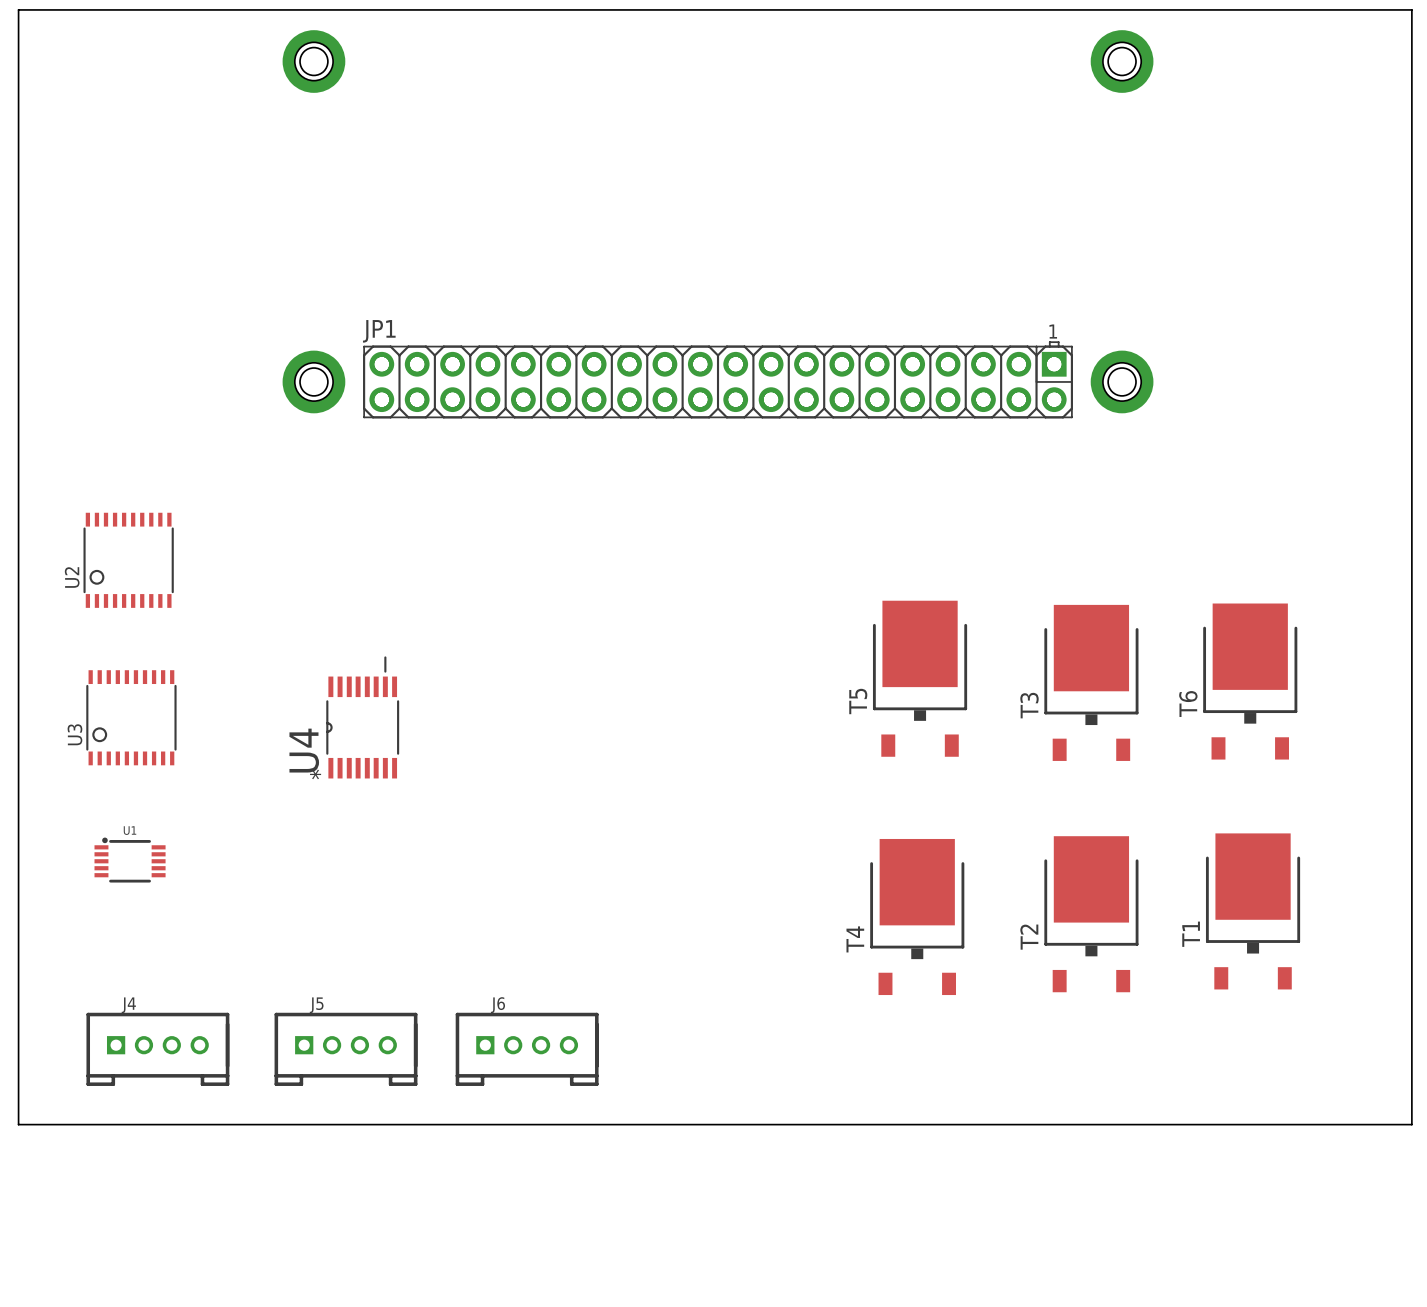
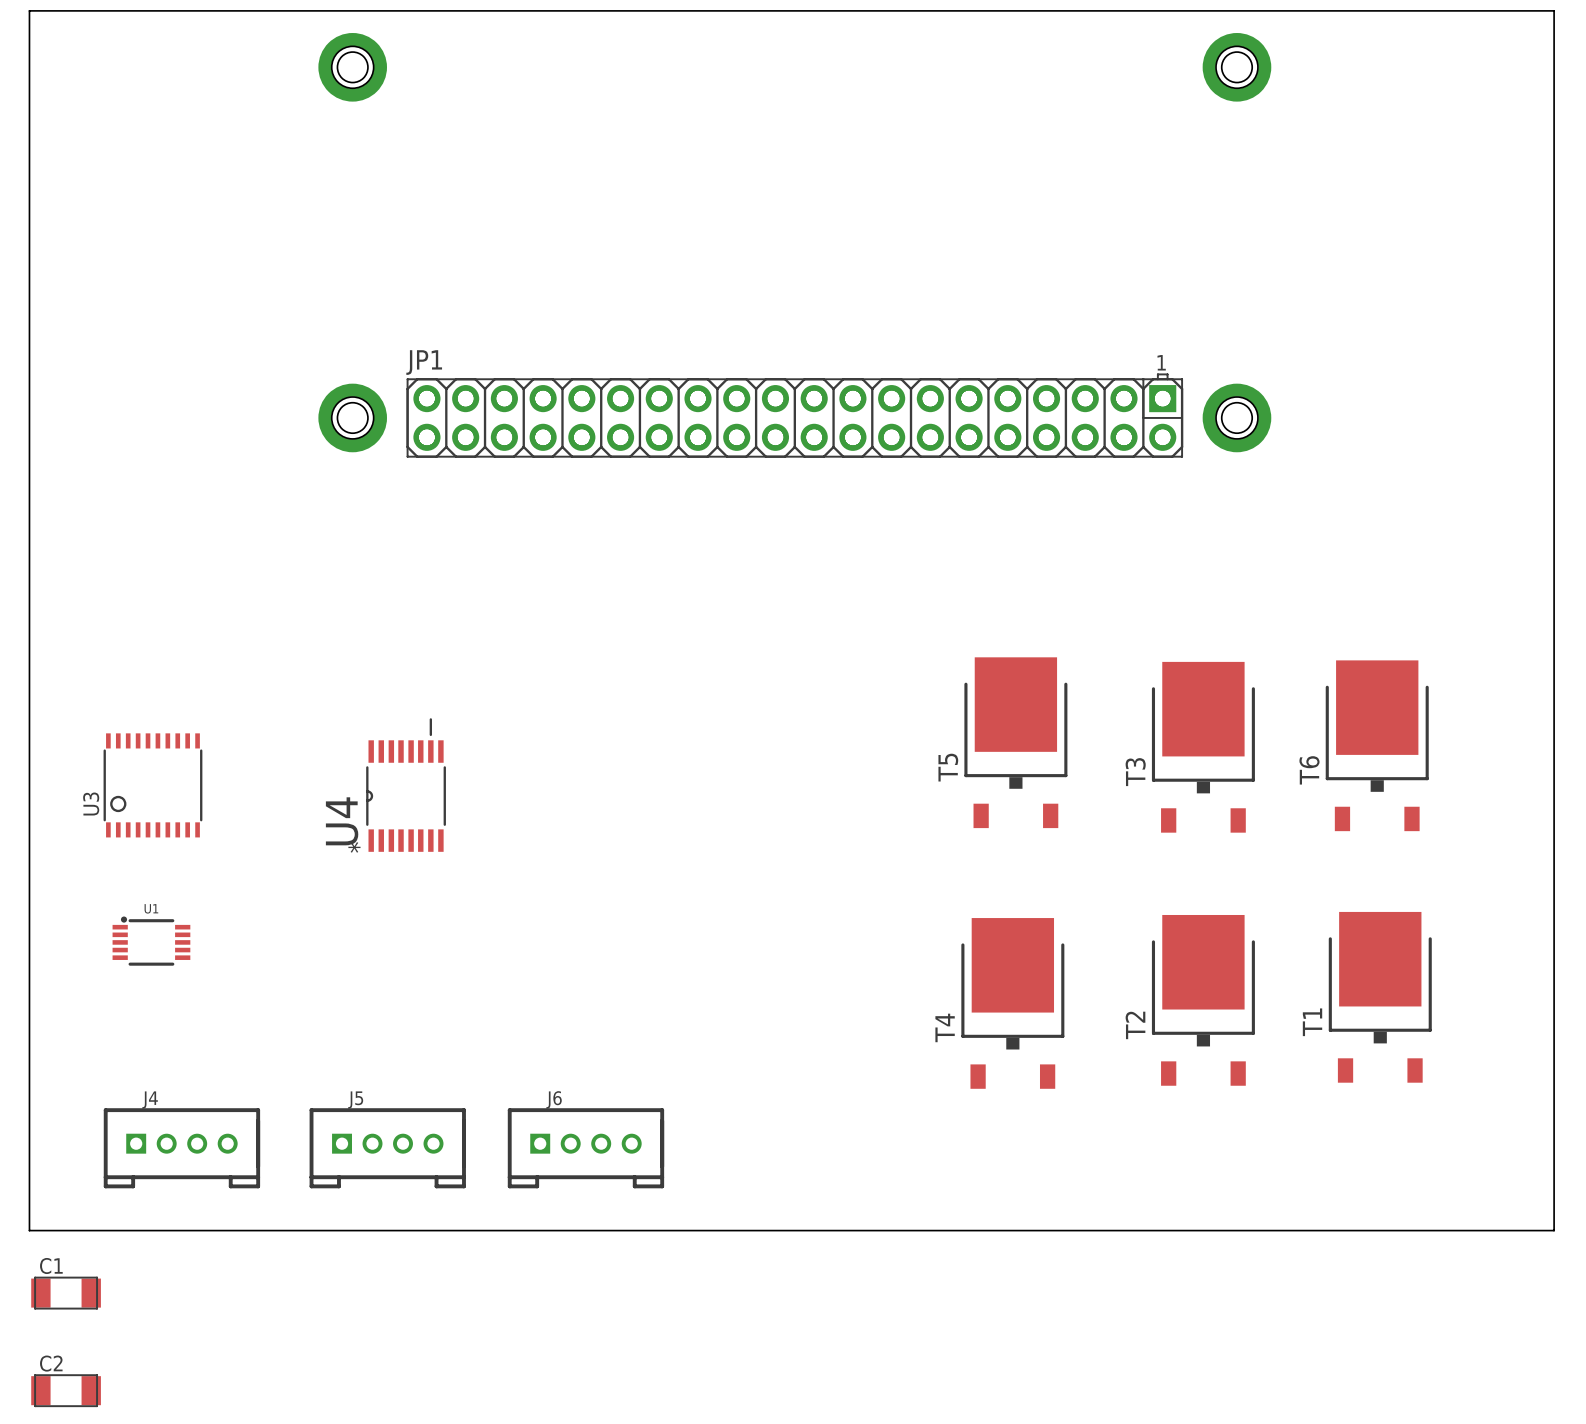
U2: (128, 560) -> none
C1: none -> (66, 1293)
C2: none -> (66, 1390)

